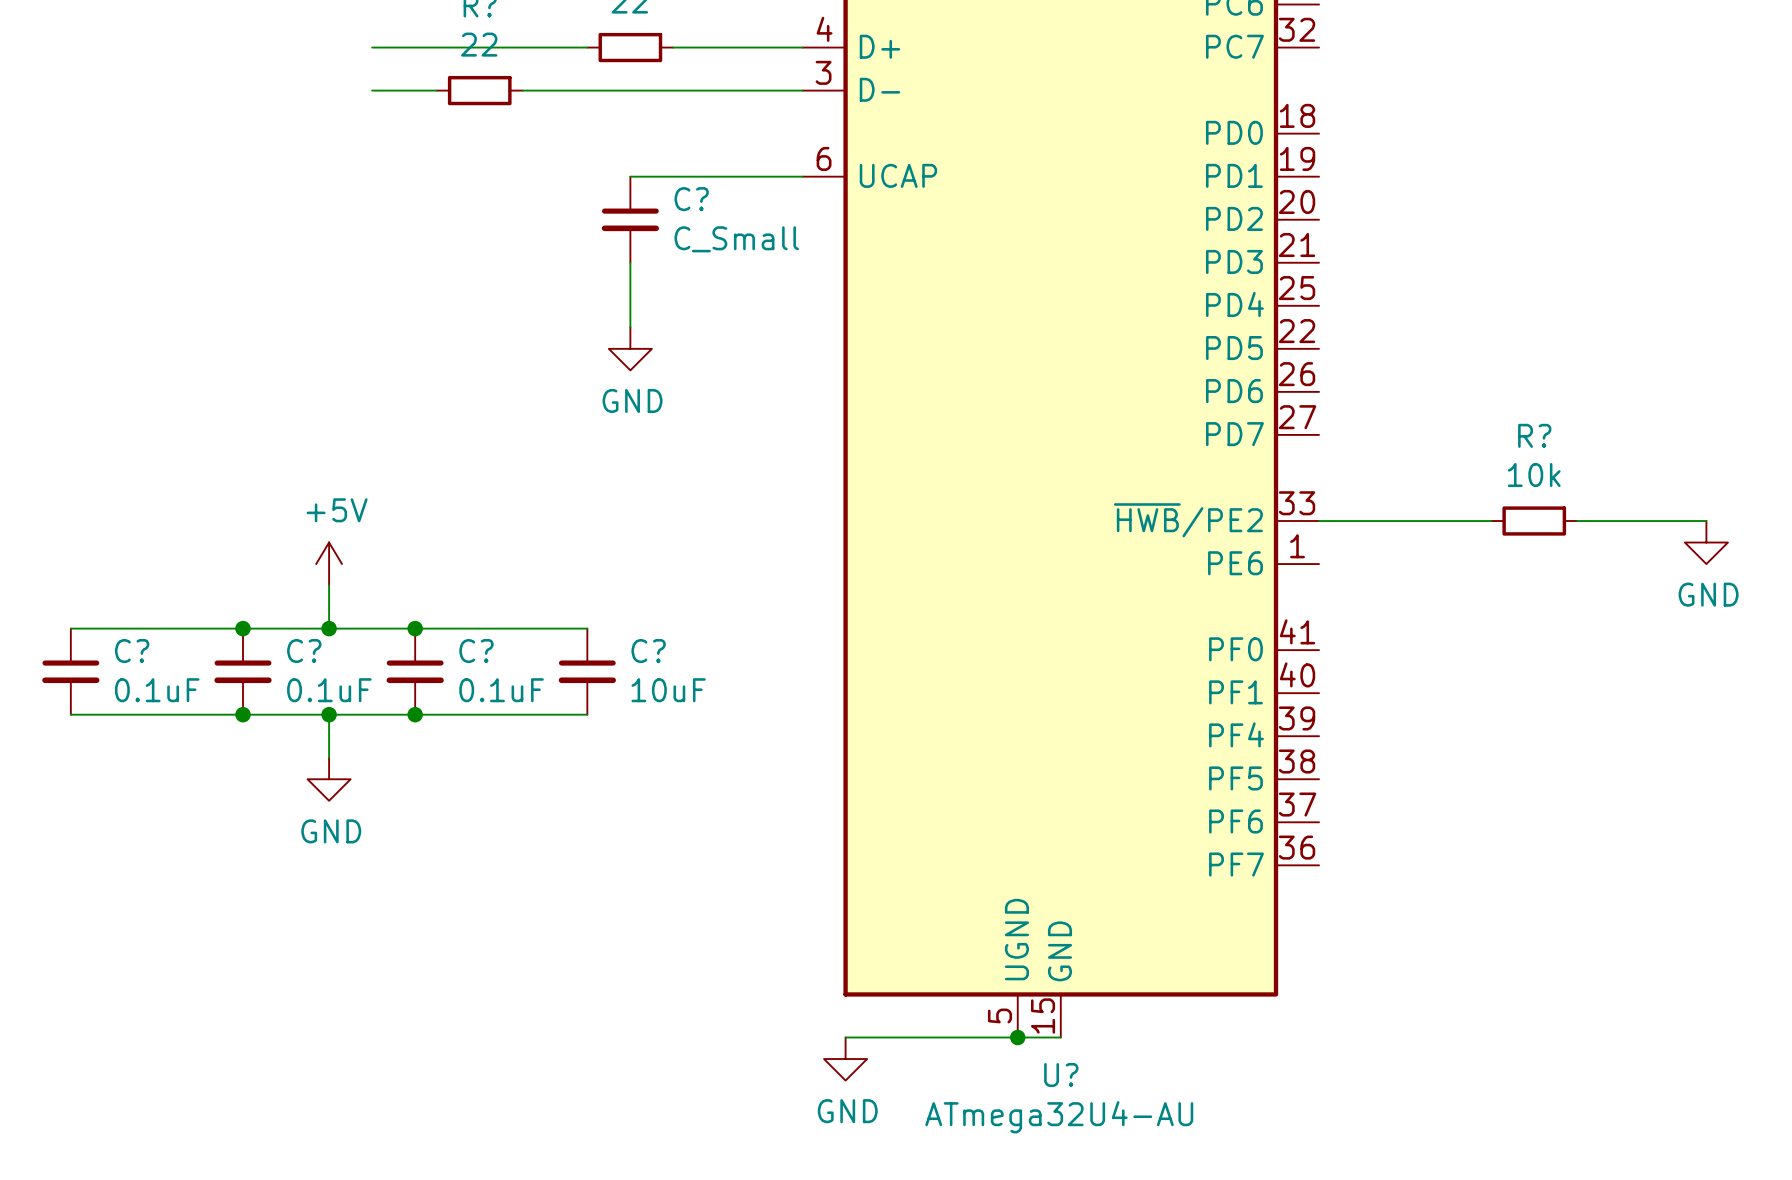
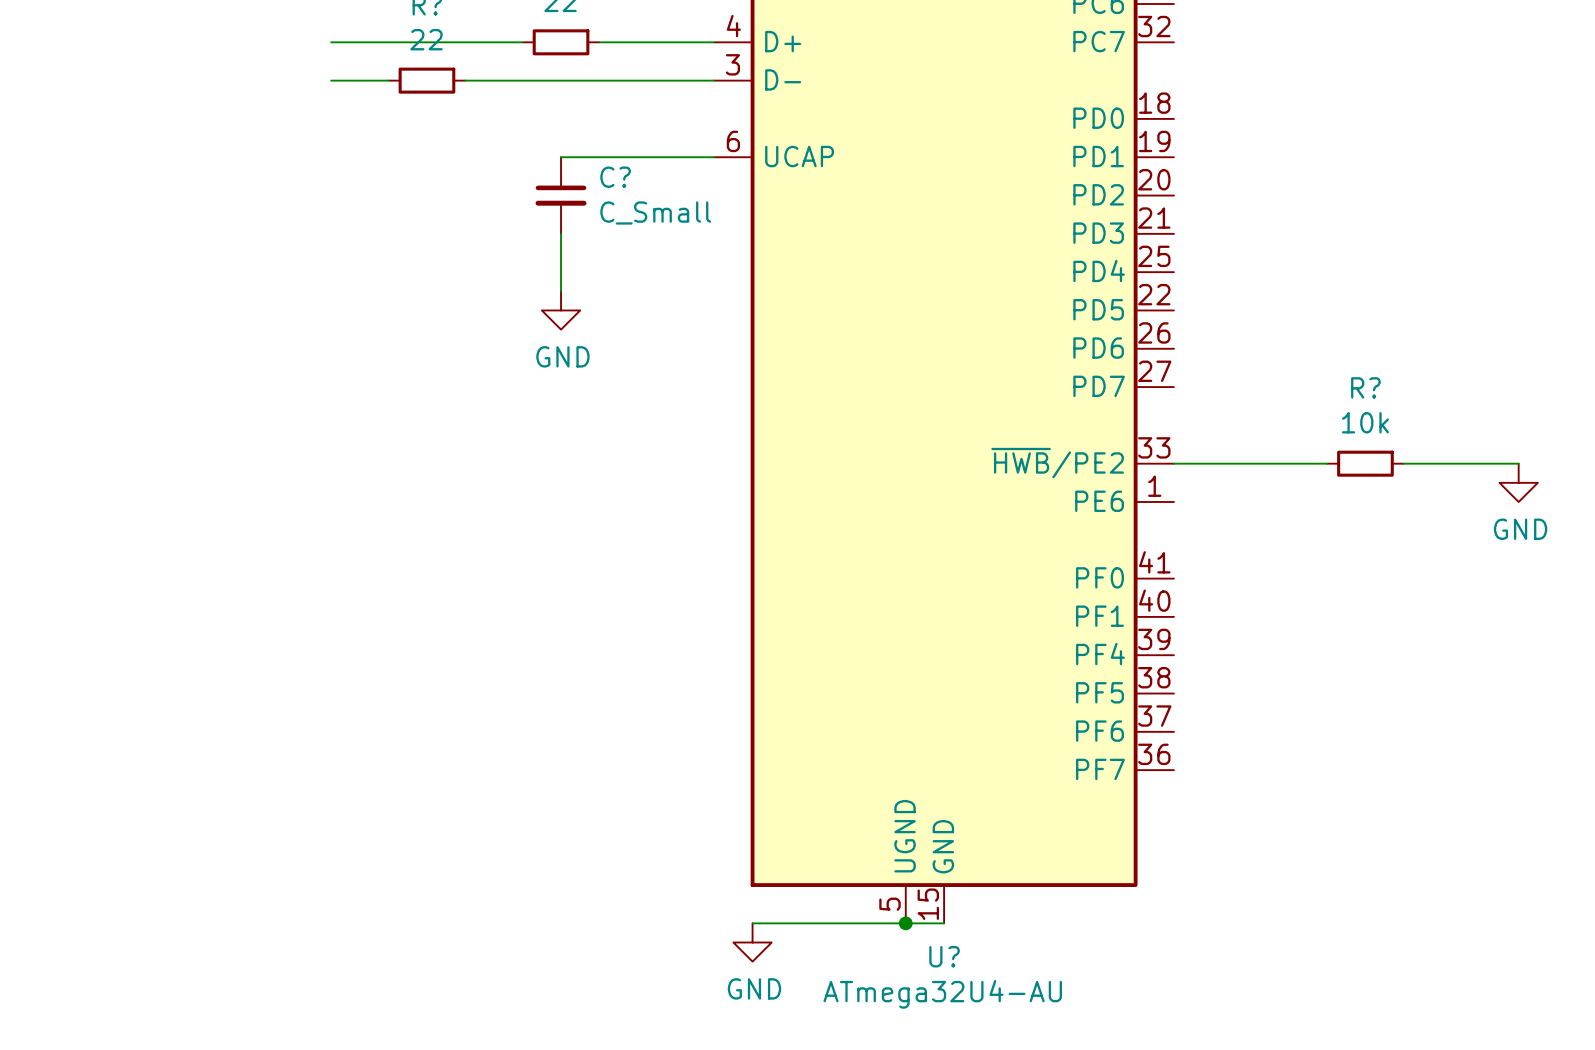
power symbol: +5V (329, 564) -> none
wire: (329, 585) (329, 628) -> none
wire: (70, 628) (587, 628) -> none
junction: (243, 628) -> none
junction: (329, 628) -> none
junction: (415, 628) -> none
C?: 0.1uF (70, 671) -> none
C?: 0.1uF (243, 671) -> none
C?: 0.1uF (415, 671) -> none
C?: 10uF (587, 671) -> none
wire: (70, 714) (587, 714) -> none
junction: (243, 714) -> none
wire: (329, 714) (329, 757) -> none
junction: (329, 714) -> none
junction: (415, 714) -> none
power symbol: GND (329, 779) -> none

